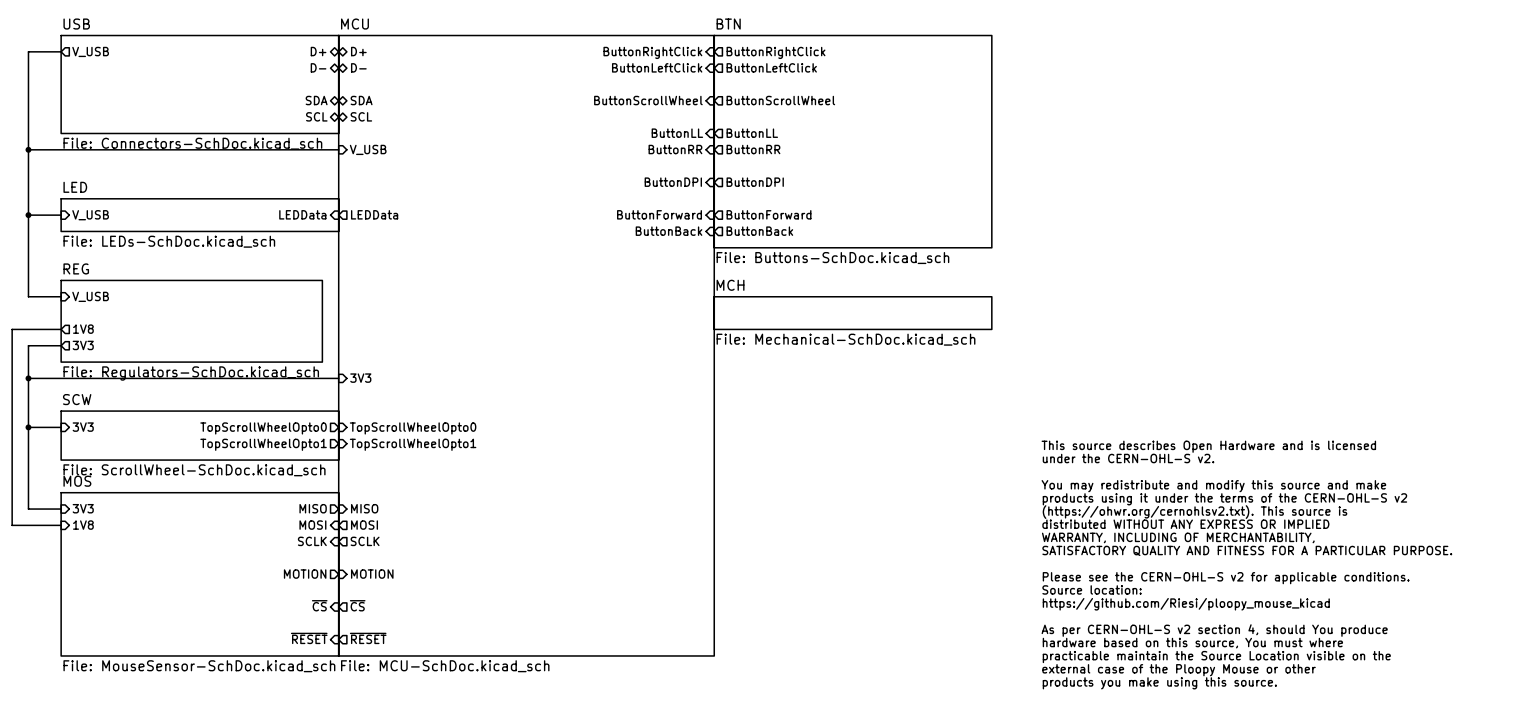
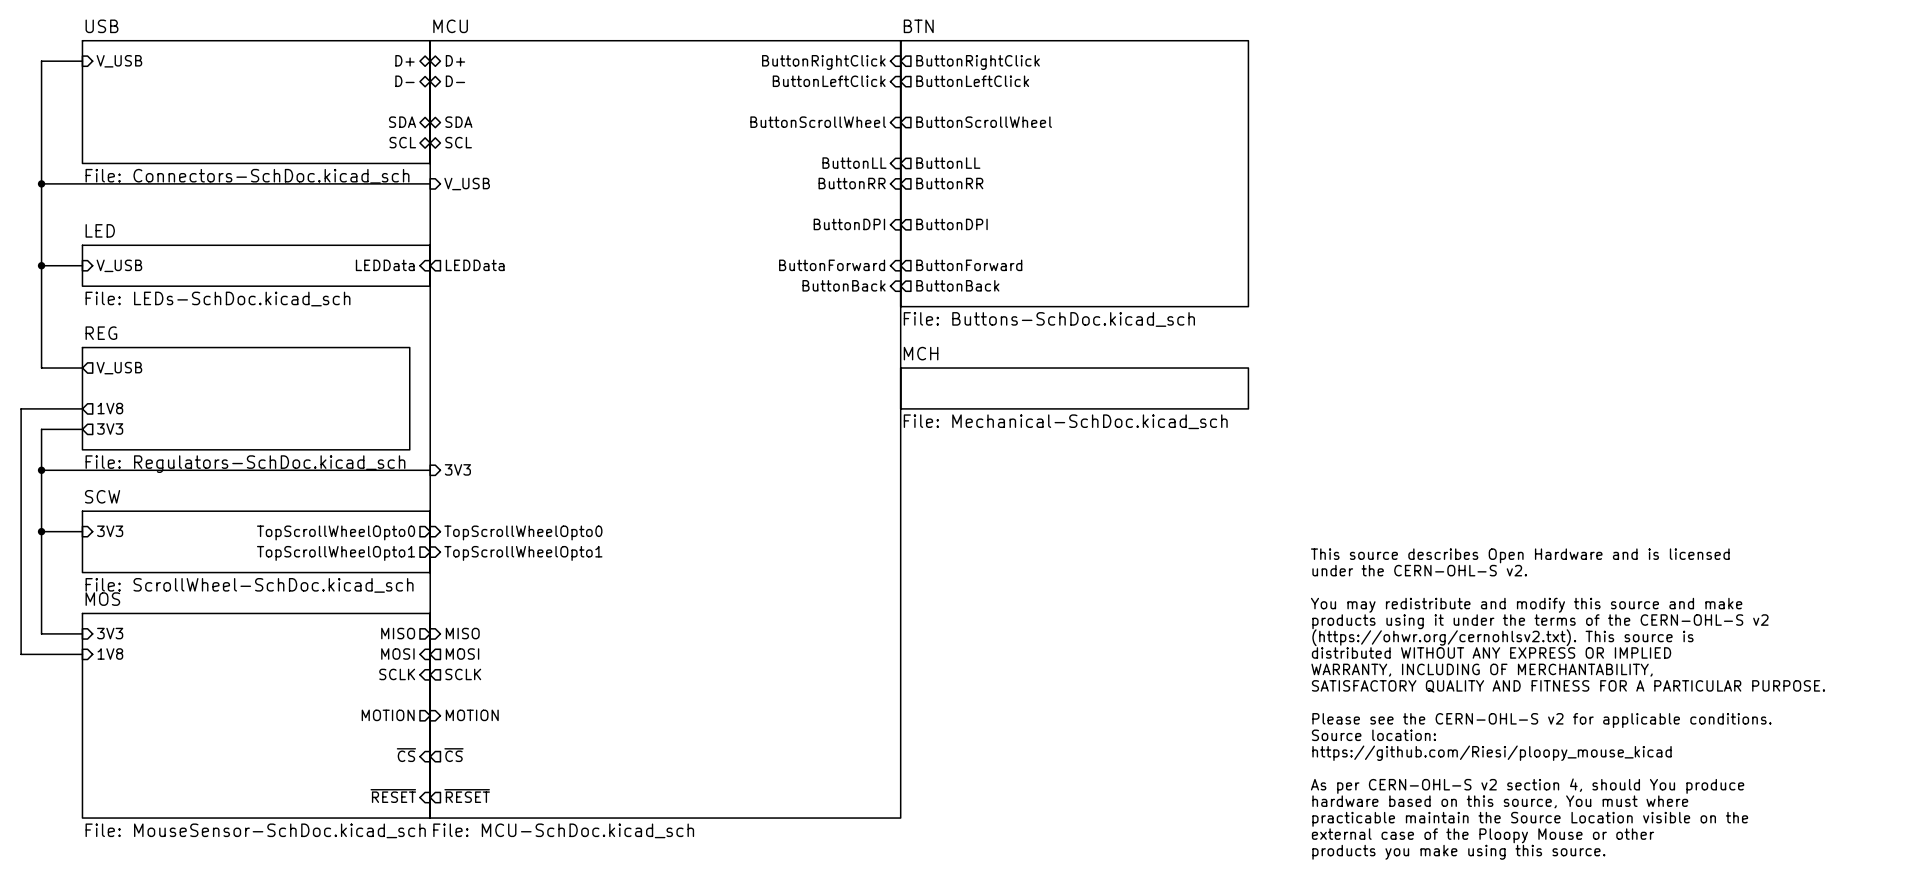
sheet pin shape: output (90, 51) -> input (119, 61)
sheet pin shape: input (90, 296) -> output (119, 368)

